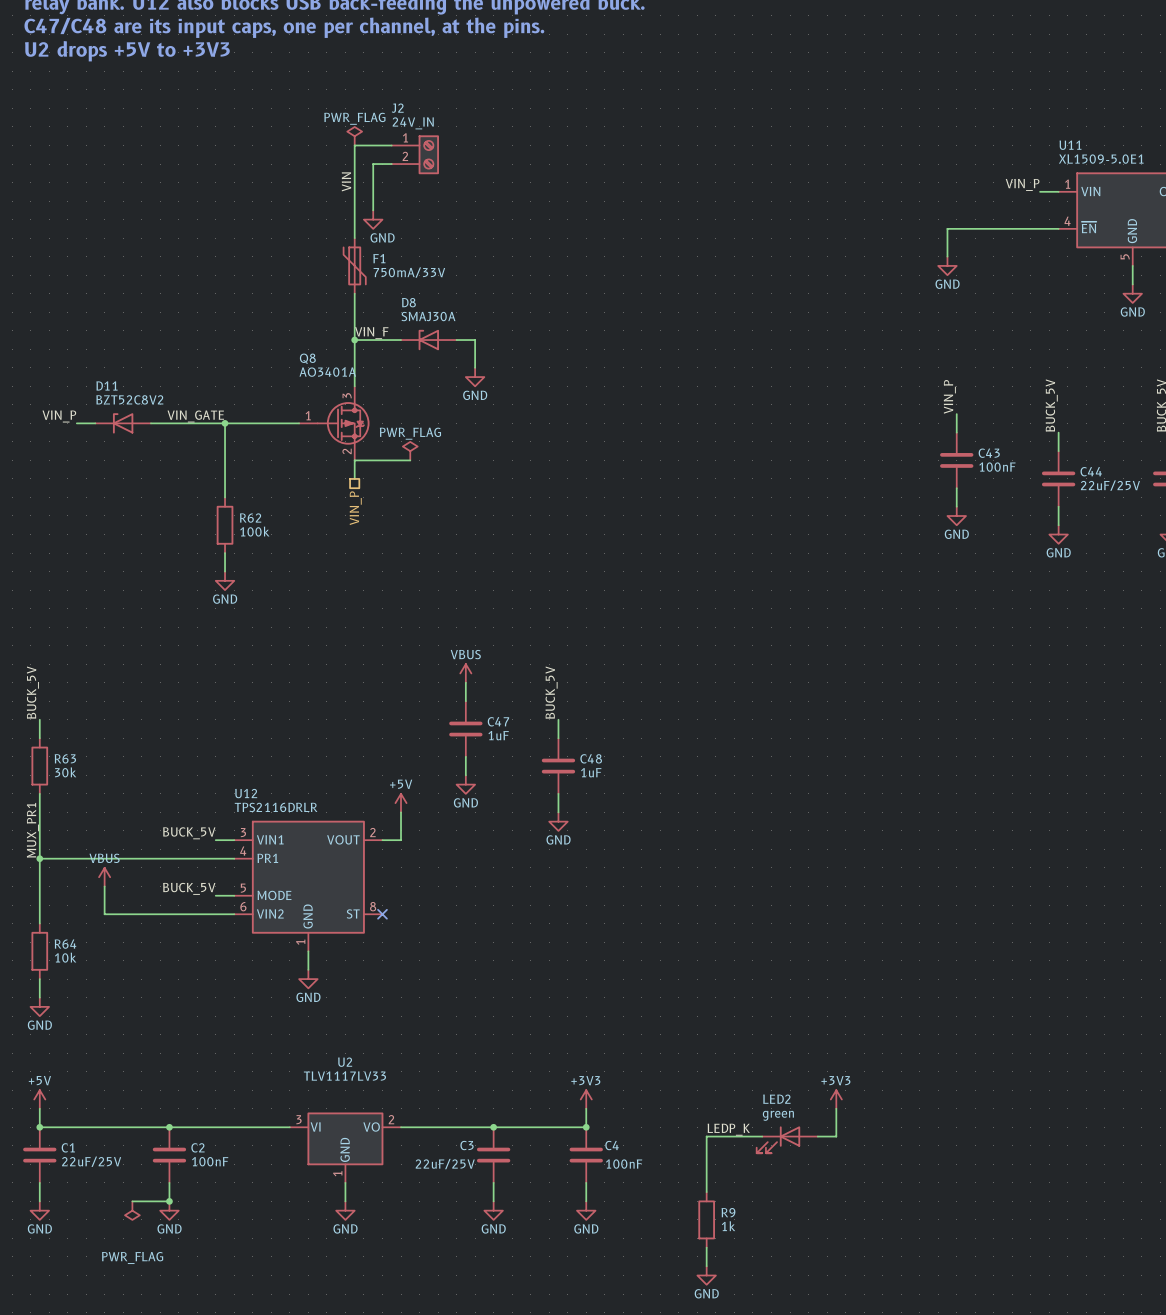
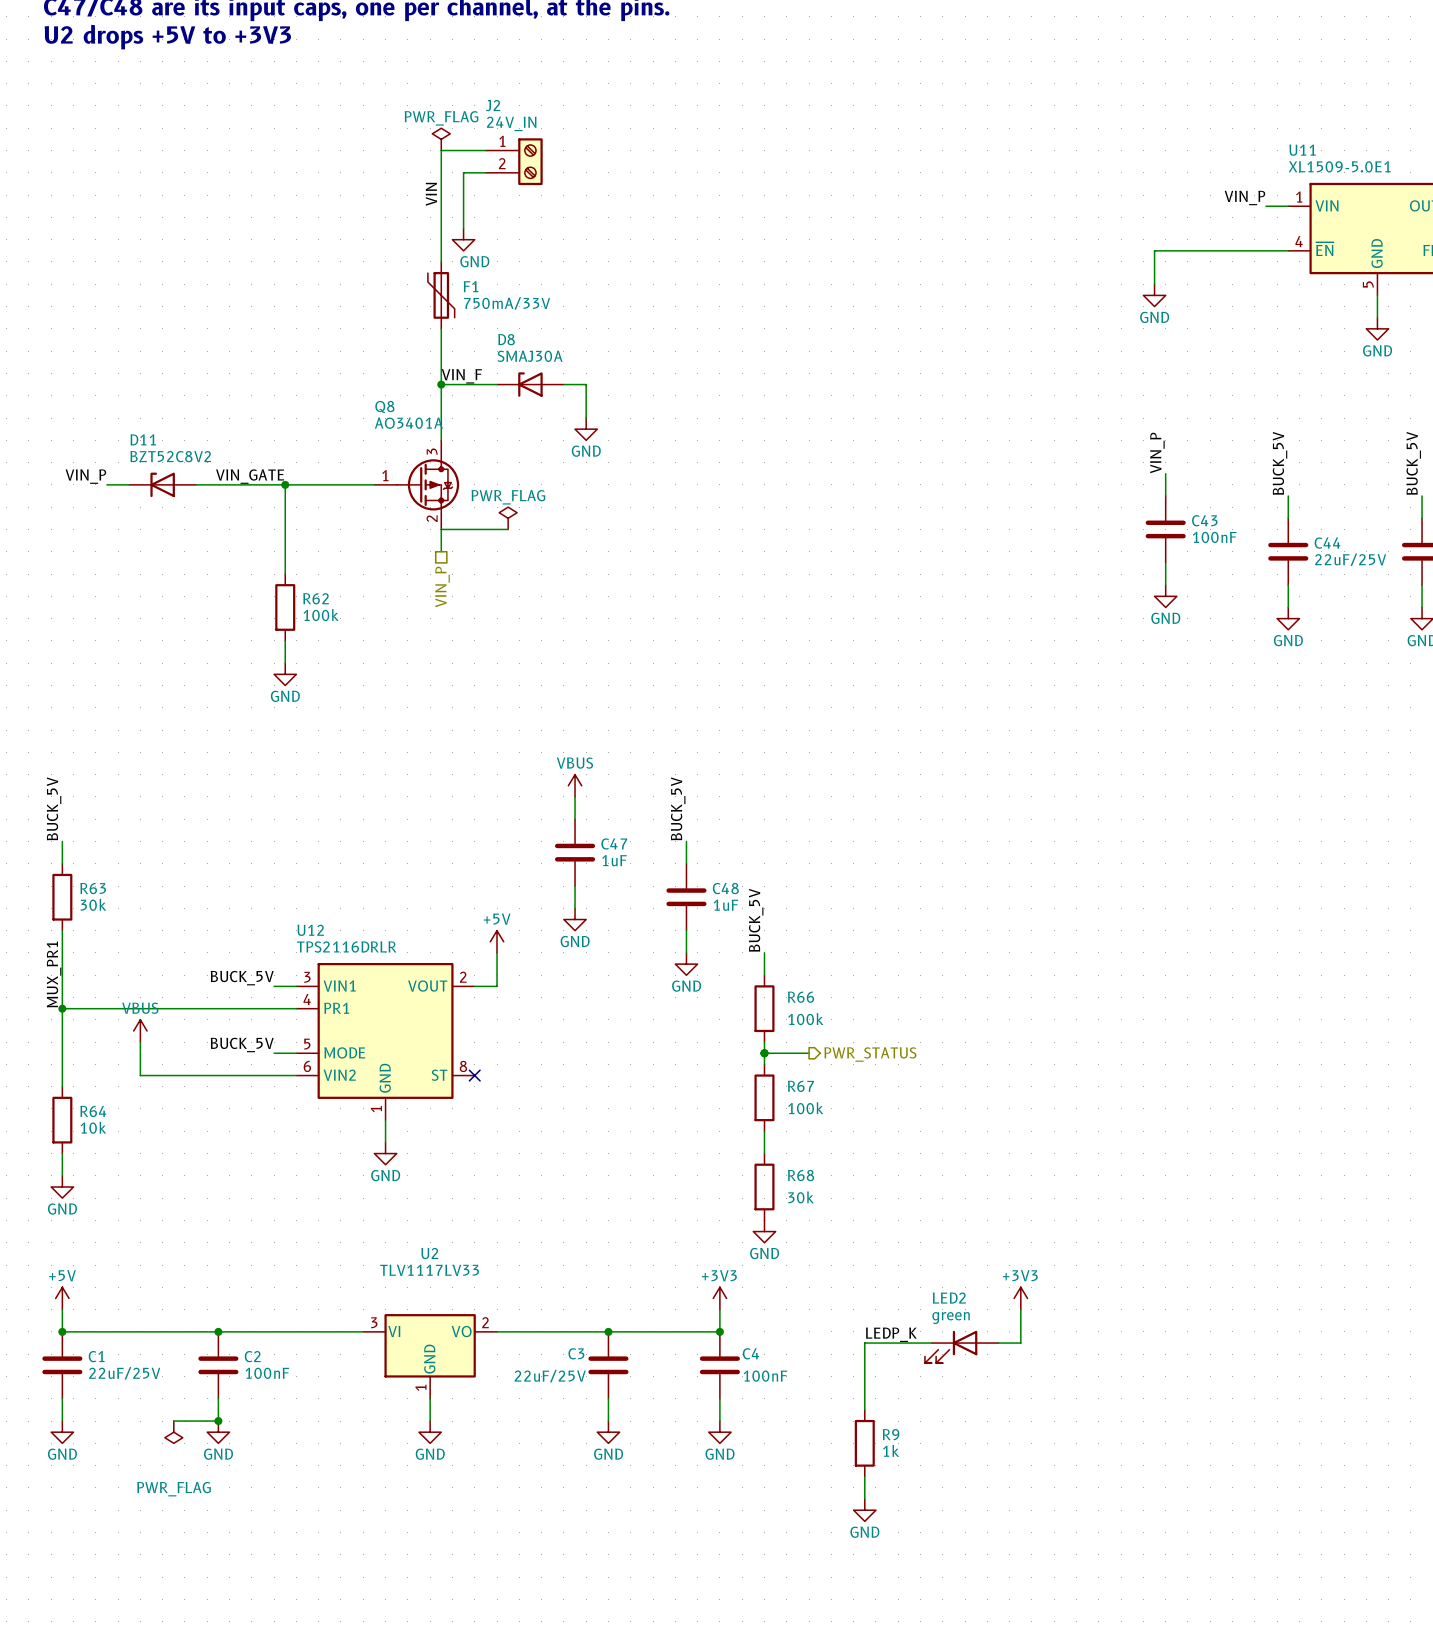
label: none -> BUCK_5V (756, 920)
wire: none -> (764, 952) (764, 975)
R66: none -> 100k (764, 1008)
wire: none -> (764, 1042) (764, 1064)
wire: none -> (764, 1053) (809, 1053)
junction: none -> (764, 1053)
hierarchical label: none -> PWR_STATUS (870, 1054)
R67: none -> 100k (764, 1097)
wire: none -> (764, 1131) (764, 1153)
R68: none -> 30k (764, 1187)
power symbol: none -> GND (764, 1231)

